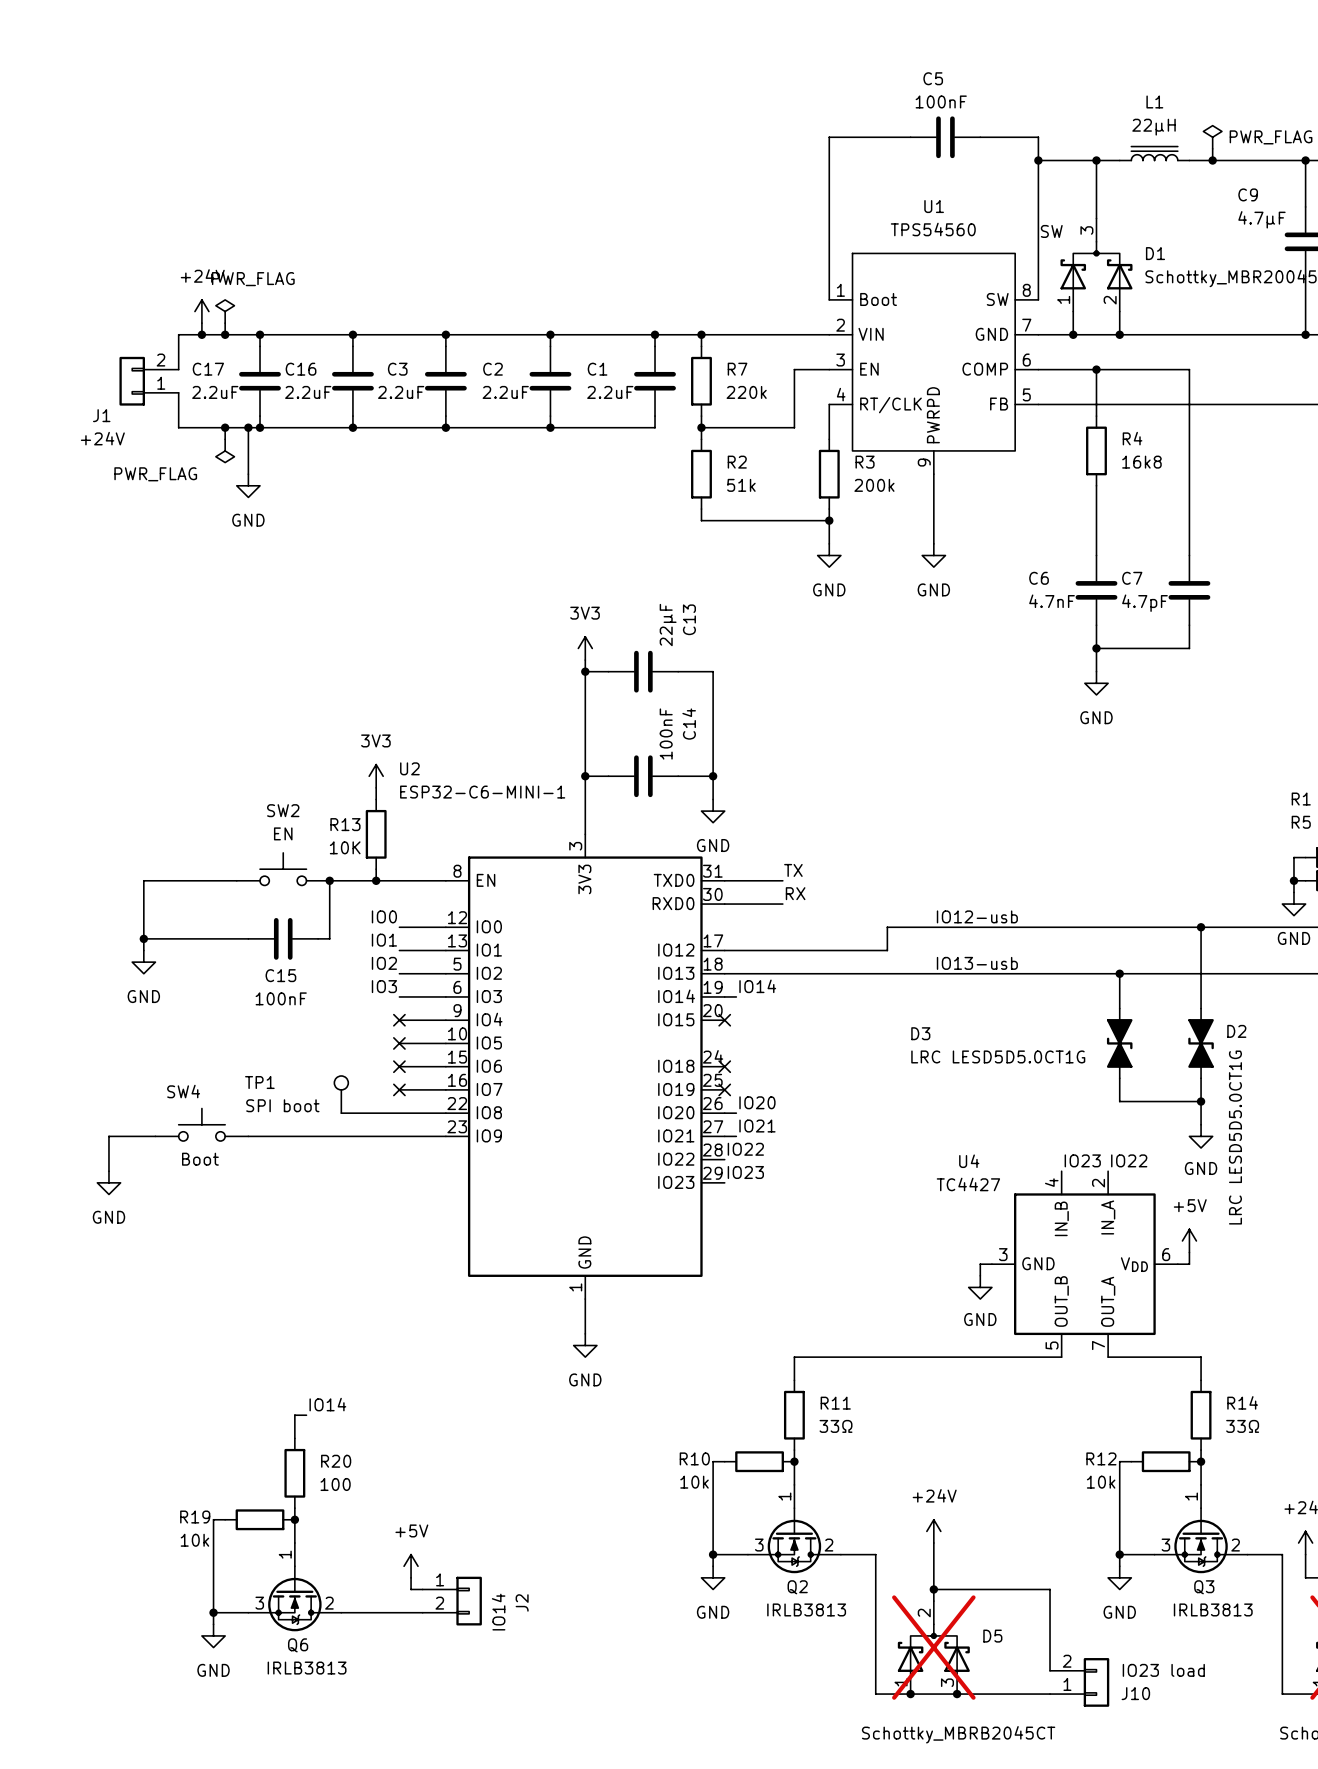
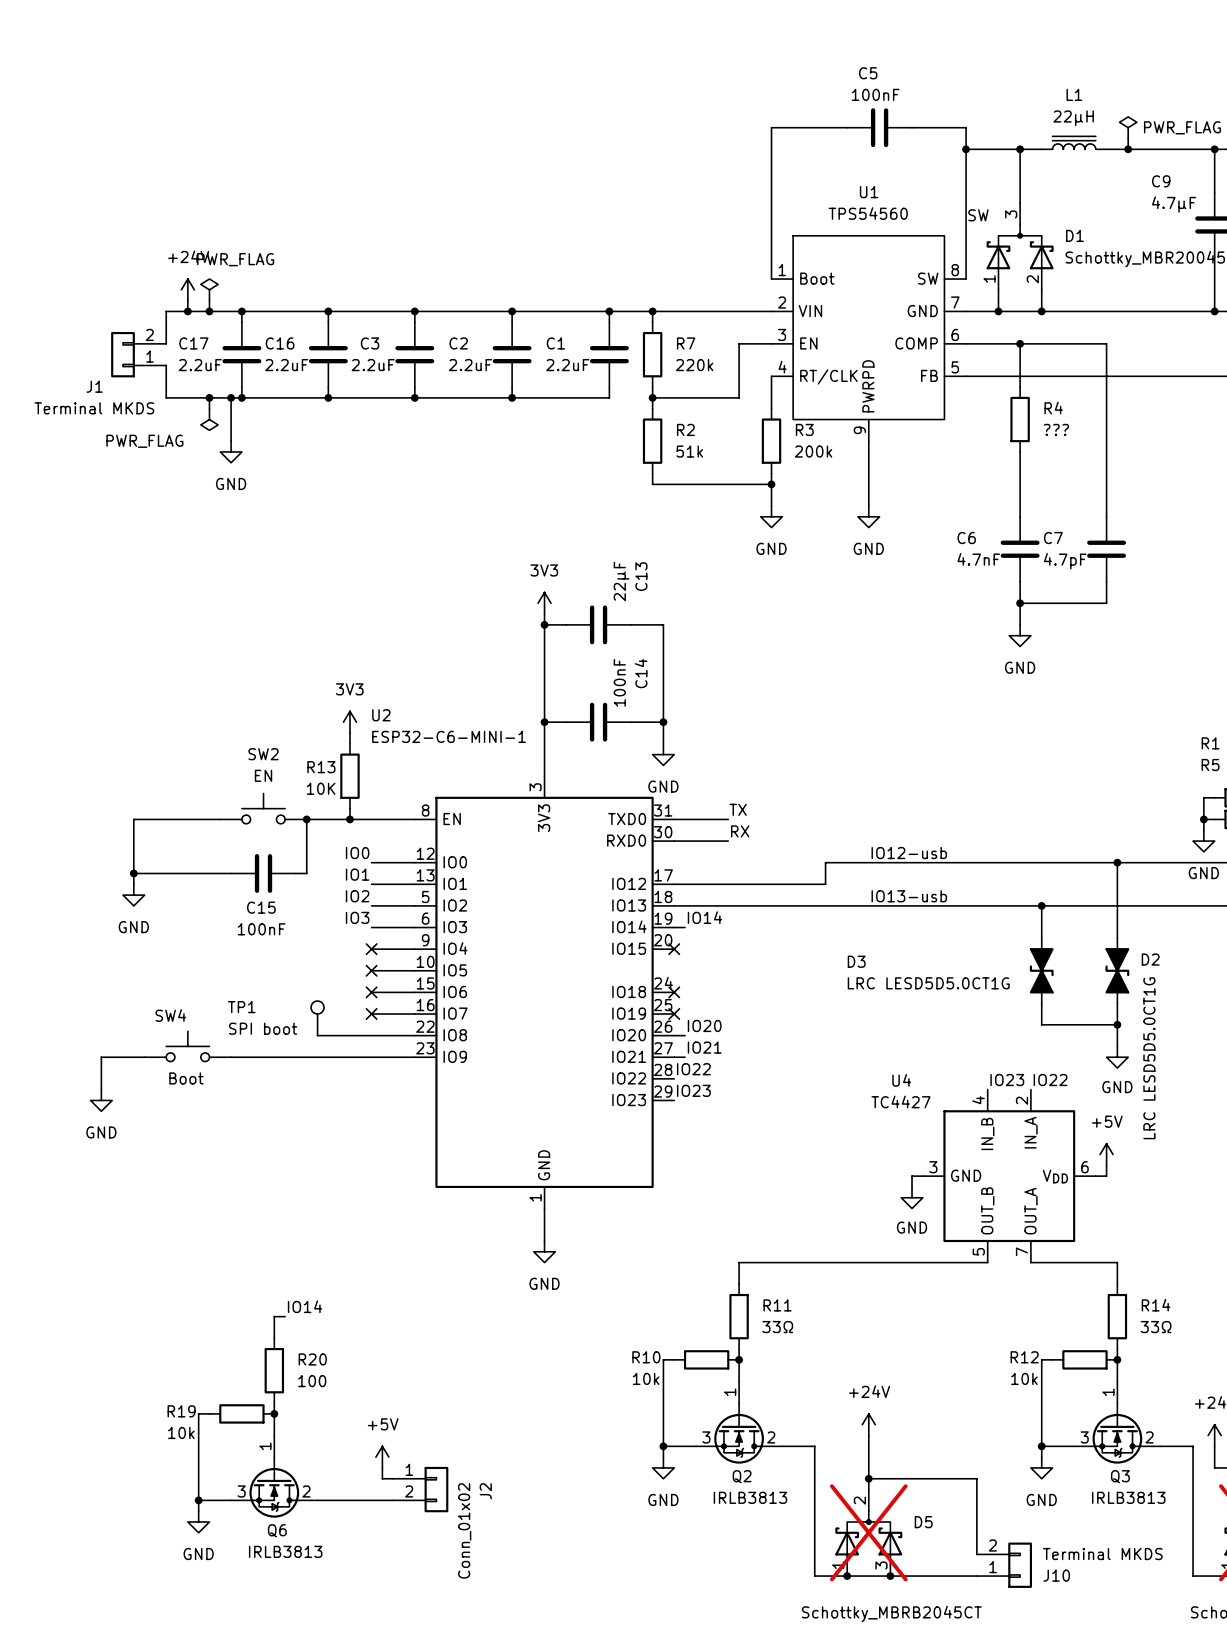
J1 value: +24V (102, 438) -> Terminal MKDS (94, 408)
R4 value: 16k8 (1141, 462) -> ??? (1056, 429)
J2 value: IO14 (498, 1612) -> Conn_01x02 (464, 1530)
J10 value: IO23 load (1163, 1670) -> Terminal MKDS (1102, 1554)

